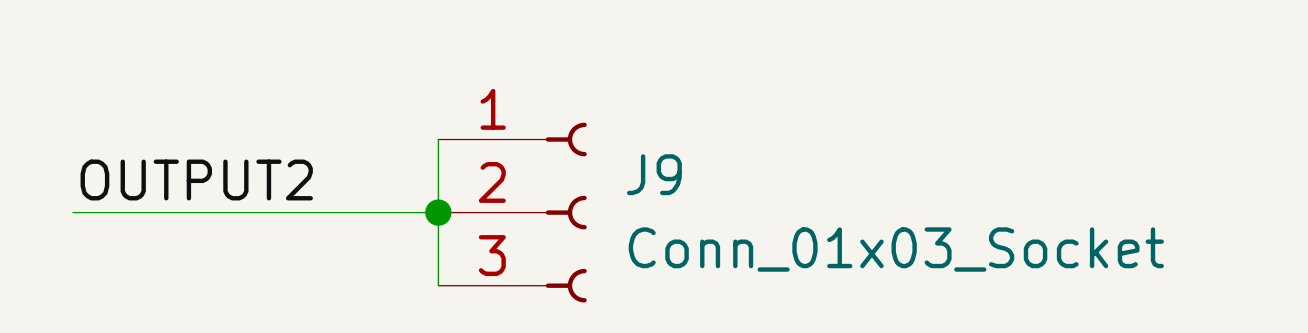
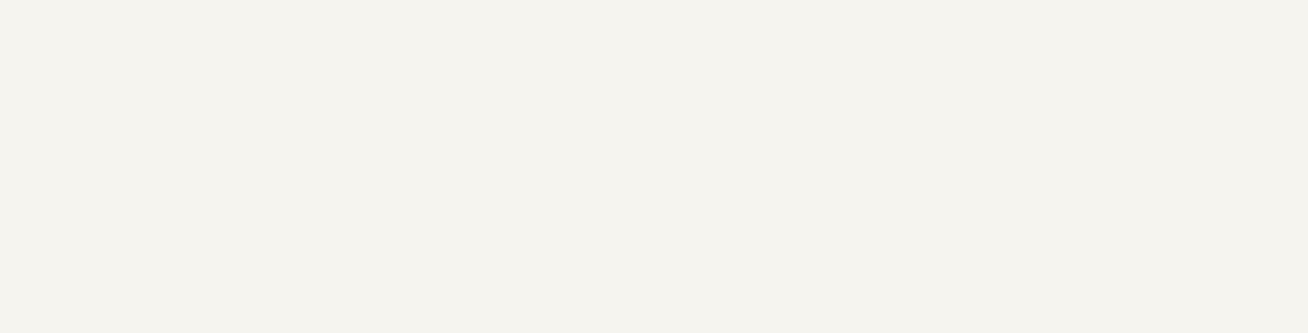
wire: (438, 139) (438, 285) -> none
label: OUTPUT2 (196, 179) -> none
wire: (72, 212) (438, 212) -> none
junction: (438, 212) -> none
J9: Conn_01x03_Socket (512, 212) -> none

